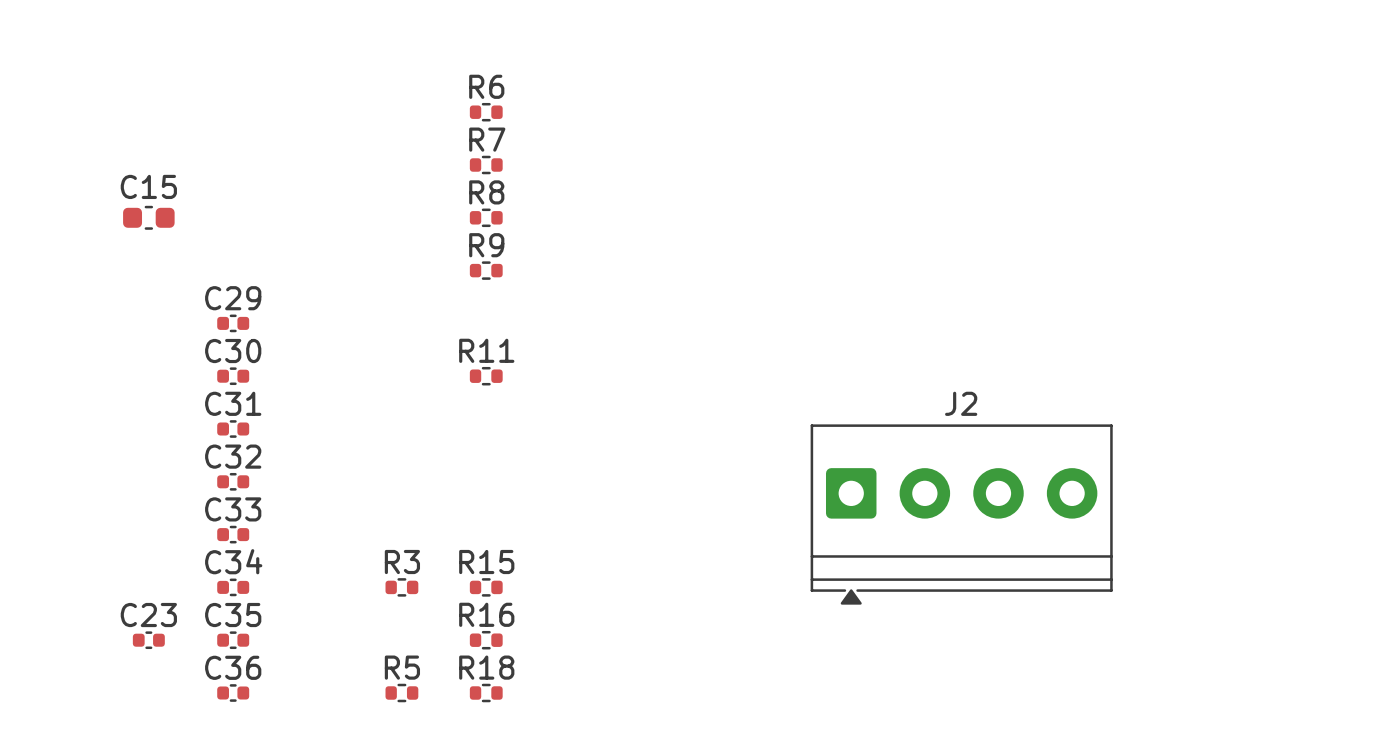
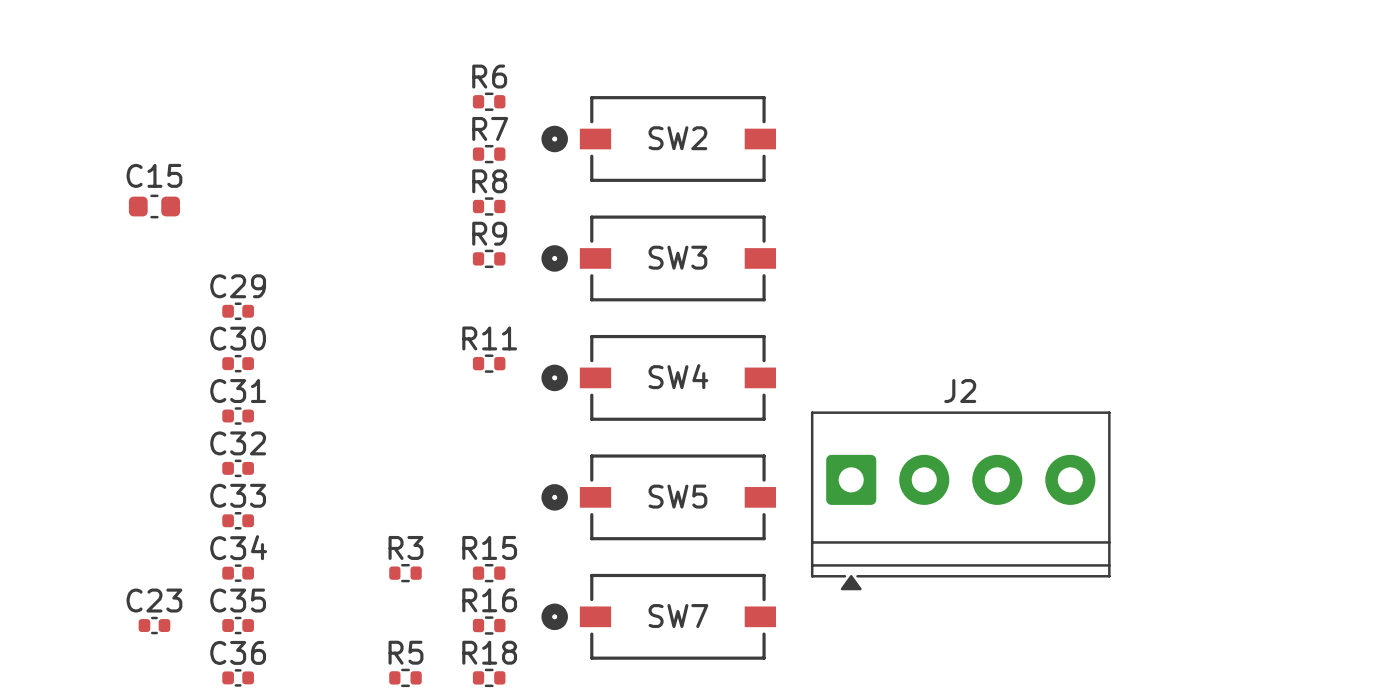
SW2: none -> (658, 139)
SW3: none -> (658, 258)
SW4: none -> (658, 377)
SW5: none -> (658, 497)
SW7: none -> (658, 616)

